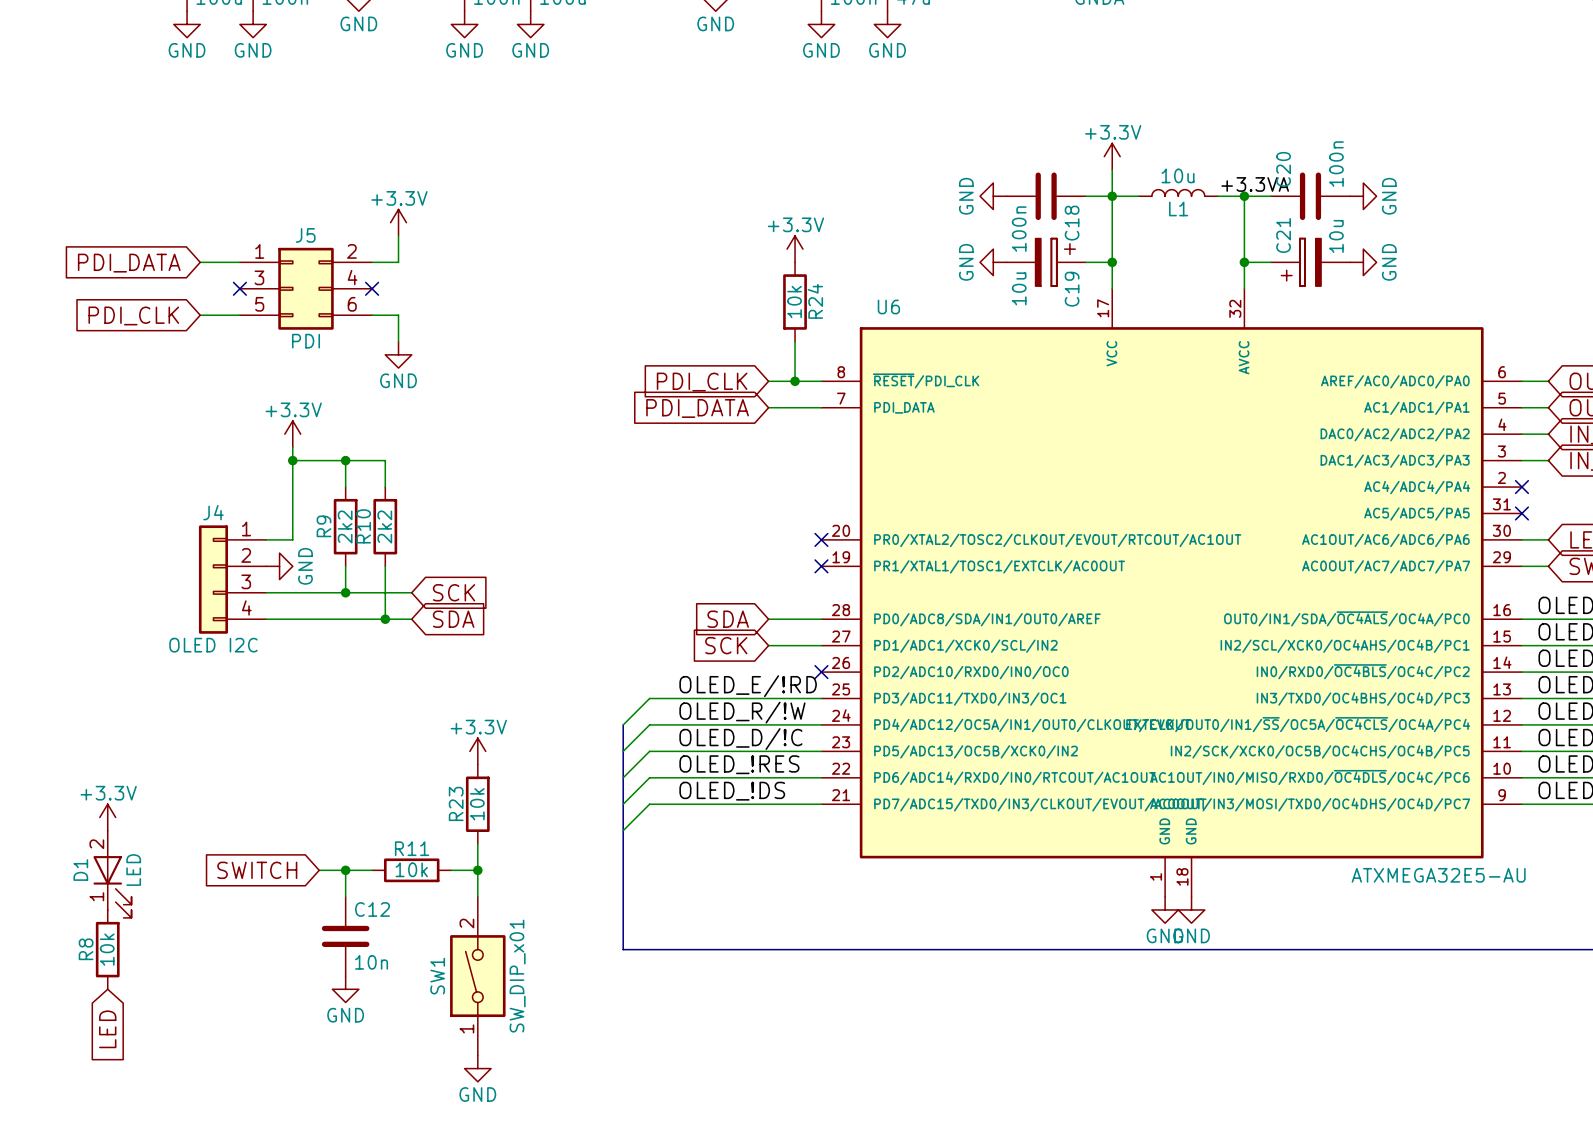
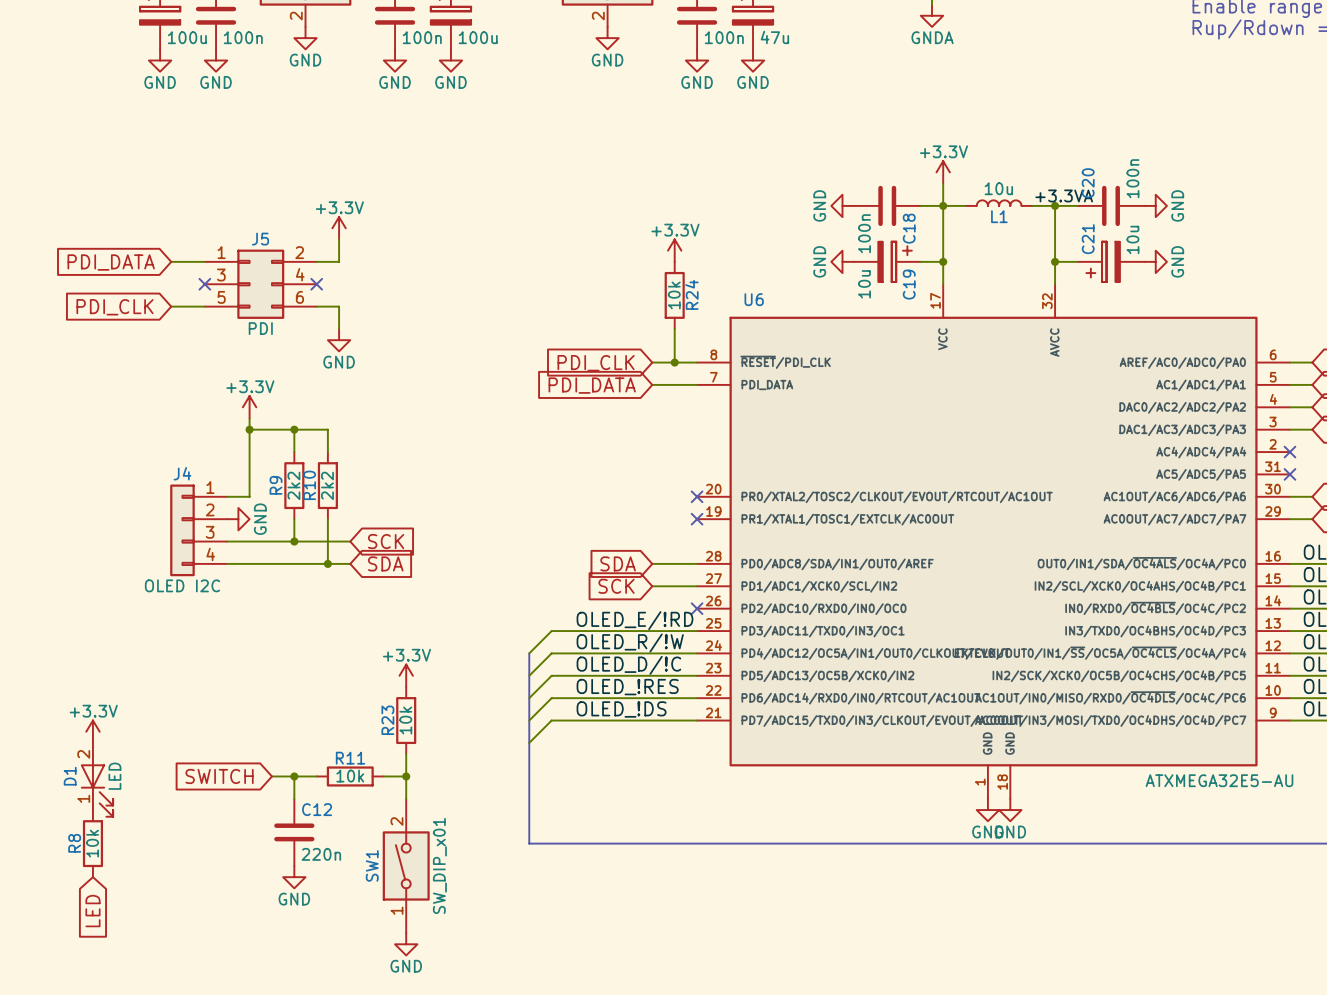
C12 value: 10n (371, 962) -> 220n (321, 854)

